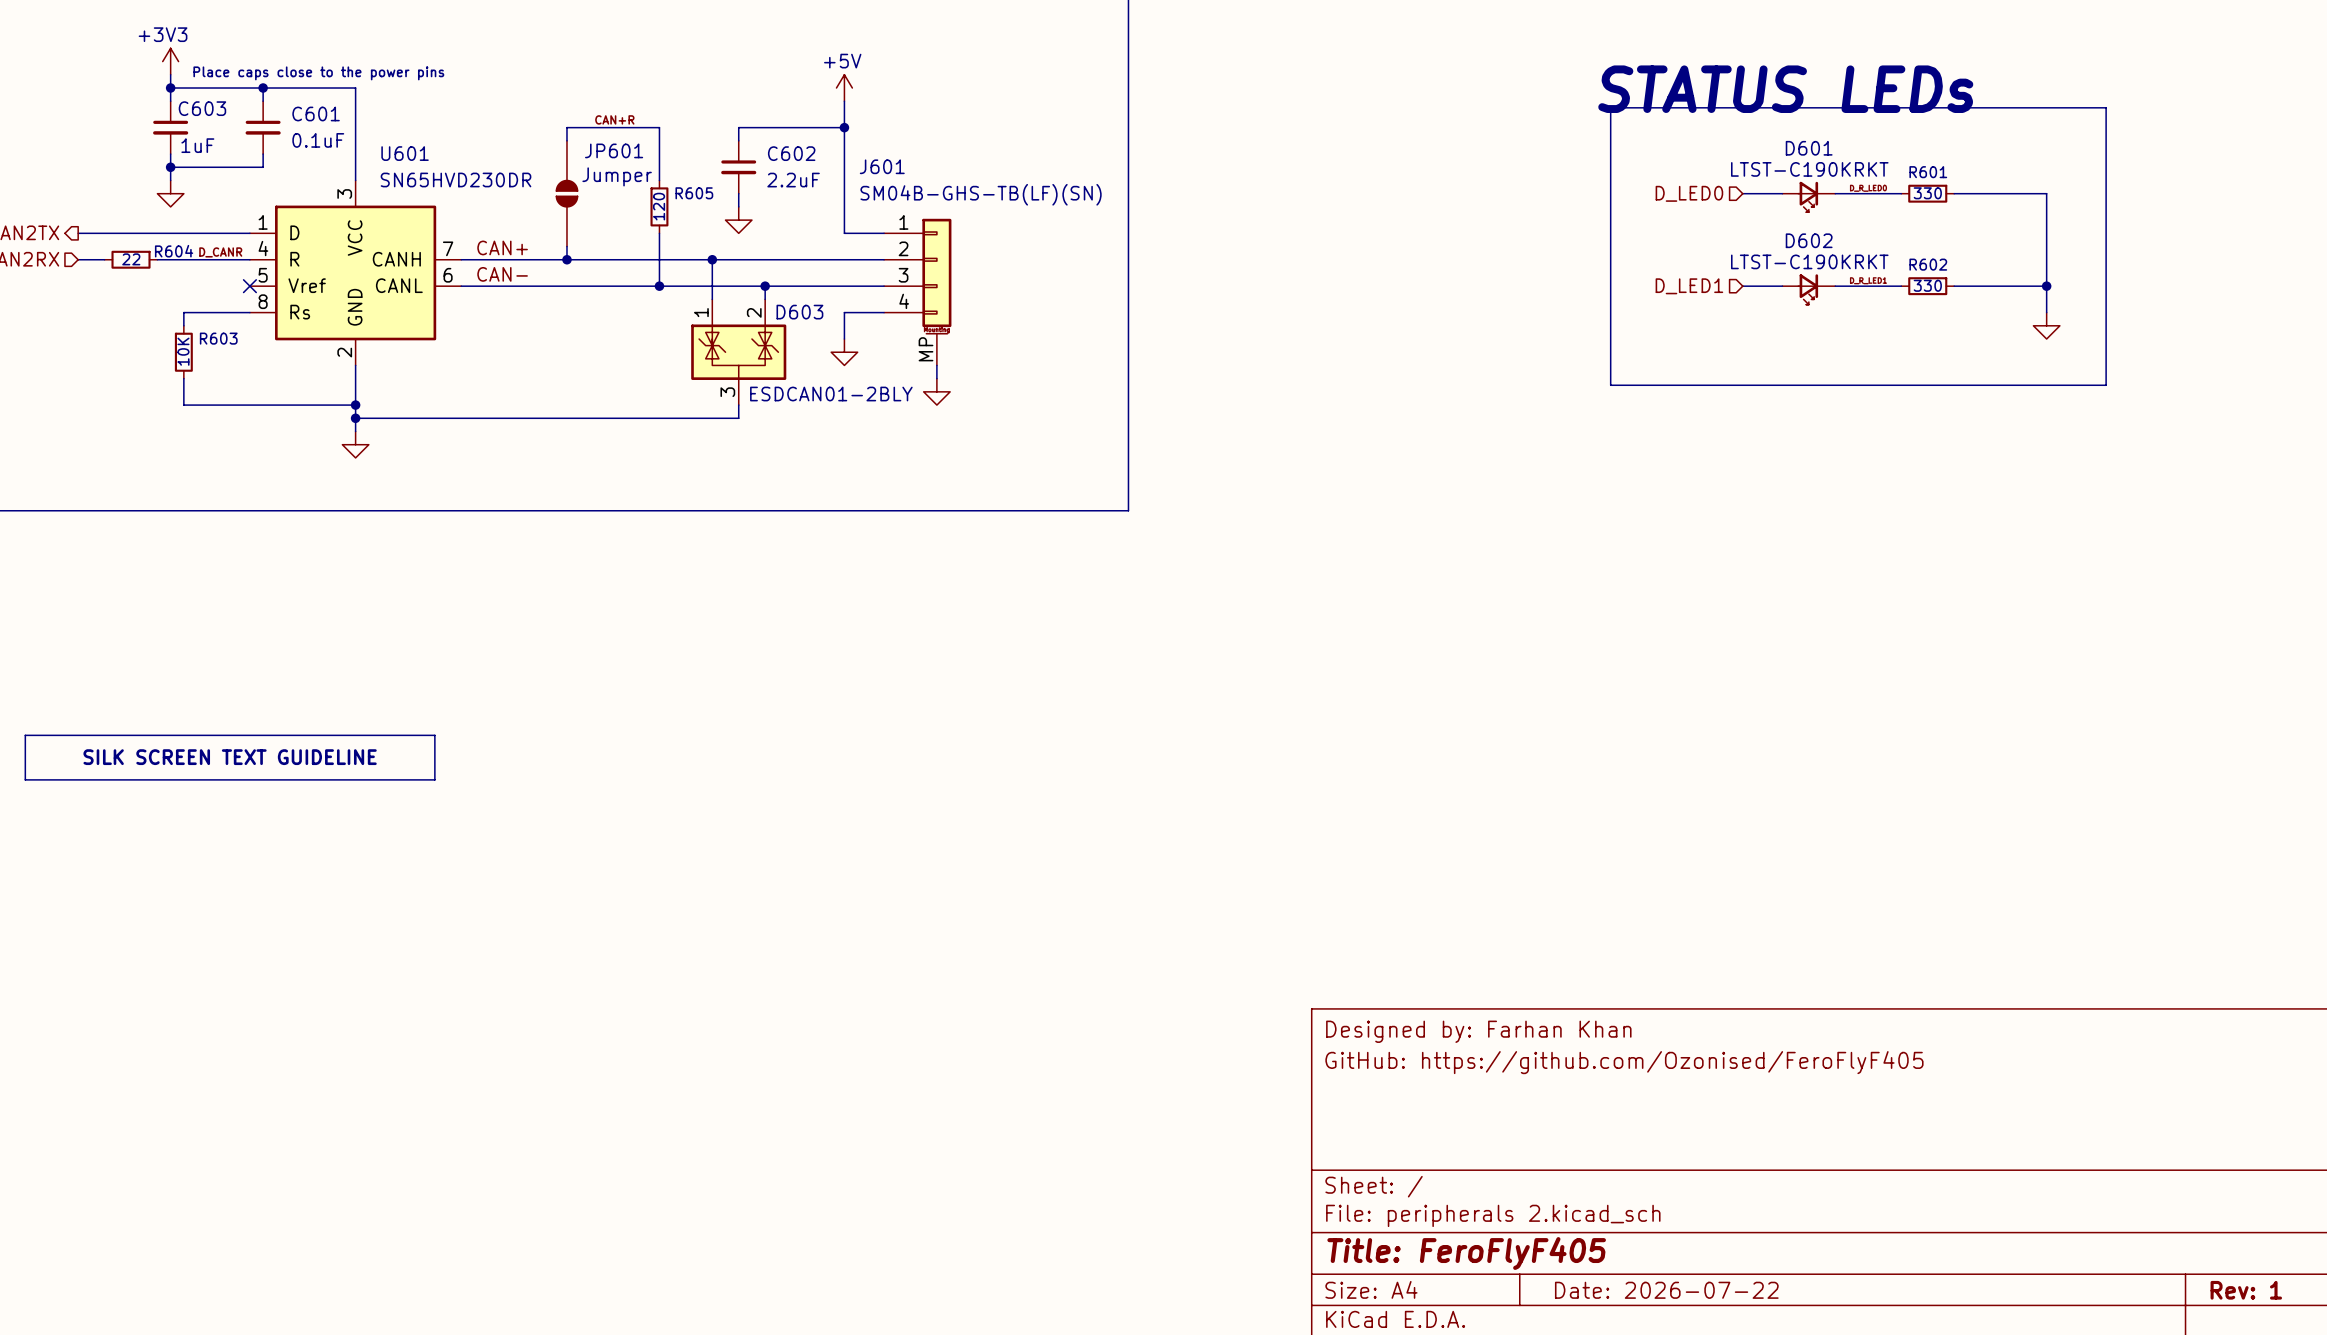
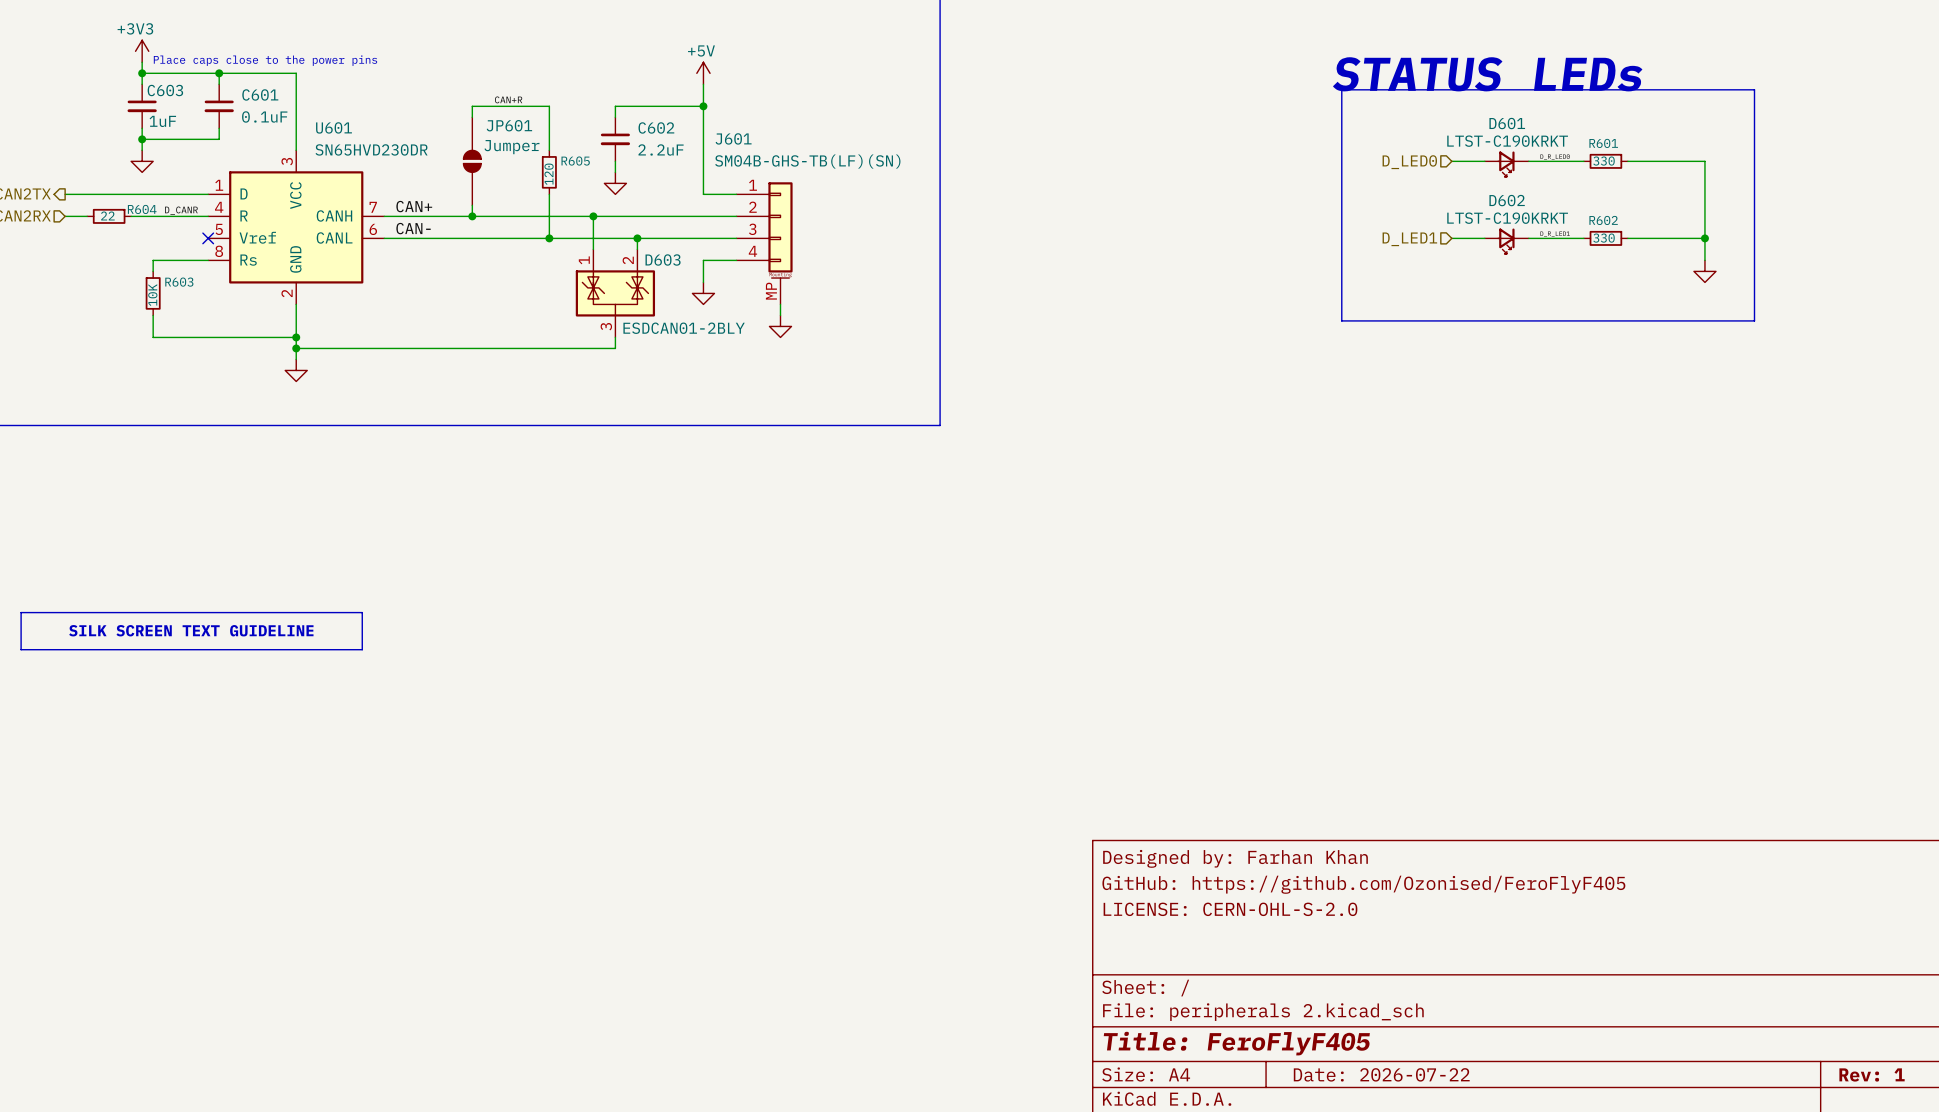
title block: none -> LICENSE: CERN-OHL-S-2.0 (1230, 909)

